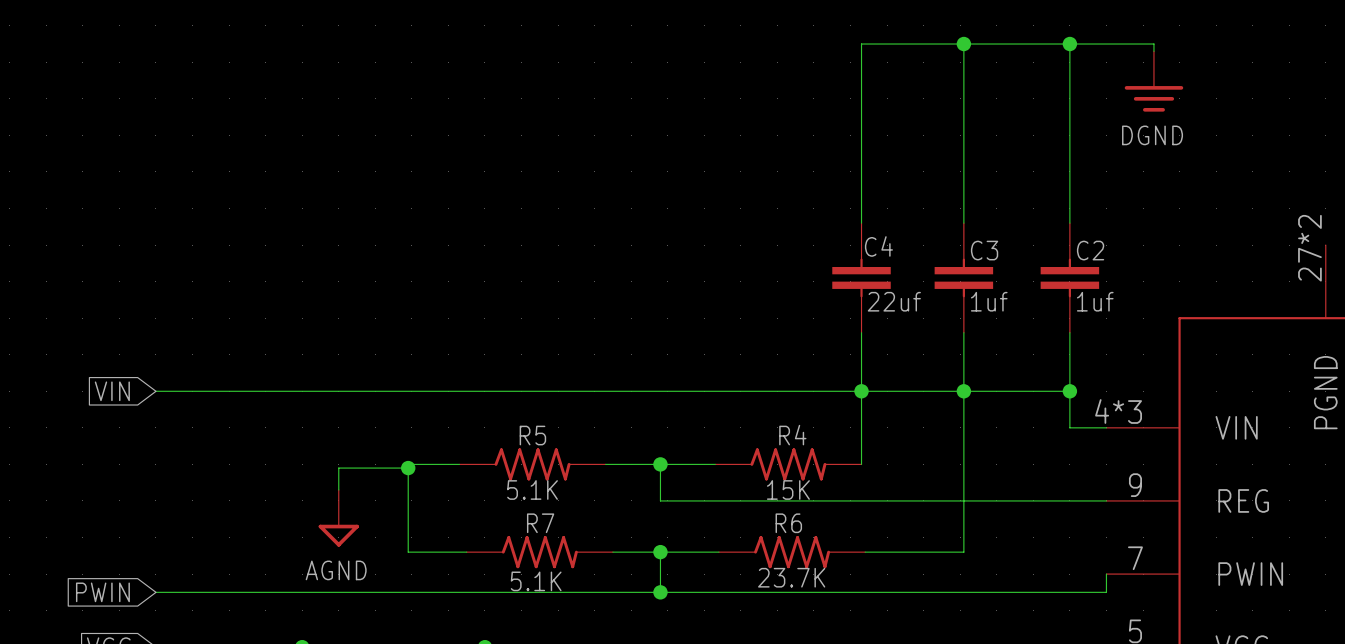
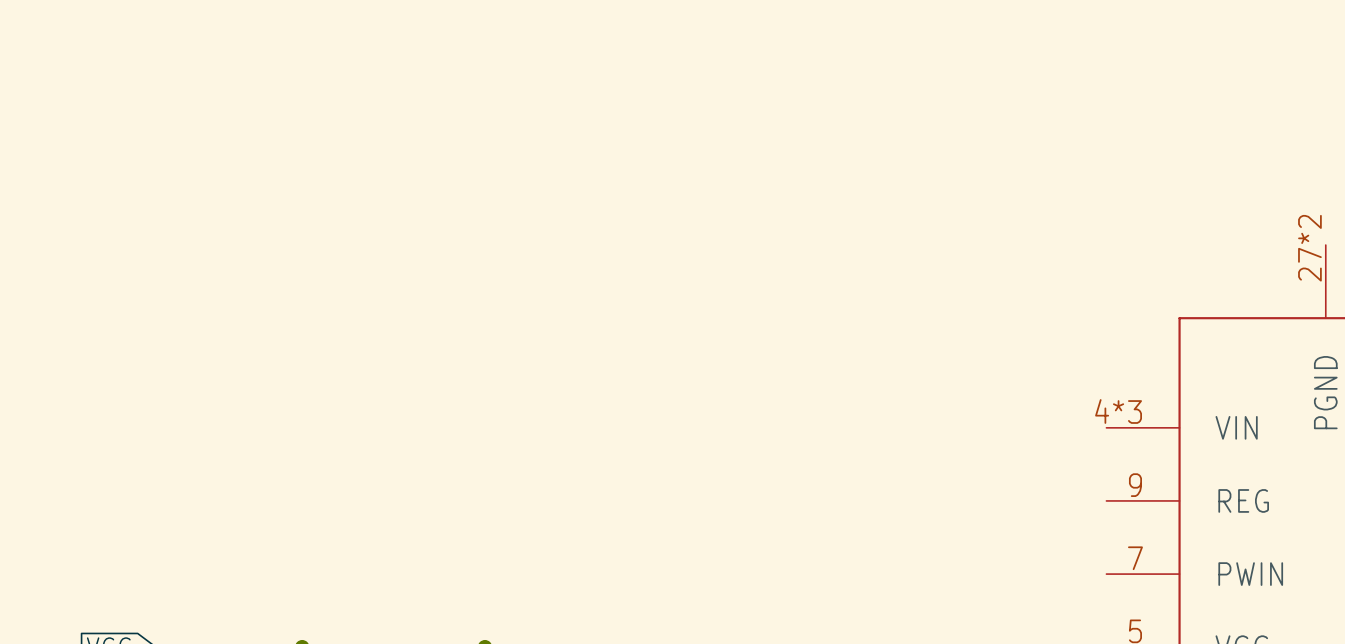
wire: (963, 44) (963, 223) -> none
junction: (963, 44) -> none
wire: (1069, 44) (1069, 223) -> none
junction: (1069, 44) -> none
wire: (1153, 51) (1153, 44) (861, 44) (861, 223) -> none
power symbol: DGND (1153, 81) -> none
C4: 22uf (861, 277) -> none
C3: 1uf (963, 277) -> none
C2: 1uf (1069, 277) -> none
wire: (861, 332) (861, 464) -> none
wire: (963, 332) (963, 552) (865, 552) -> none
wire: (1069, 332) (1069, 427) (1106, 427) -> none
global label: VIN (112, 391) -> none
wire: (155, 391) (1069, 391) -> none
junction: (861, 391) -> none
junction: (963, 391) -> none
junction: (1069, 391) -> none
wire: (459, 464) (408, 464) (408, 552) (466, 552) -> none
R5: 5.1K (532, 464) -> none
wire: (605, 464) (715, 464) -> none
wire: (660, 464) (660, 500) (1106, 500) -> none
junction: (660, 464) -> none
R4: 15K (788, 464) -> none
wire: (408, 468) (338, 468) (338, 489) -> none
junction: (408, 468) -> none
power symbol: AGND (338, 518) -> none
R7: 5.1K (539, 552) -> none
wire: (612, 552) (718, 552) -> none
wire: (660, 552) (660, 592) -> none
junction: (660, 552) -> none
R6: 23.7K (792, 552) -> none
wire: (1106, 574) (1106, 592) (155, 592) -> none
global label: PWIN (102, 592) -> none
junction: (660, 592) -> none

